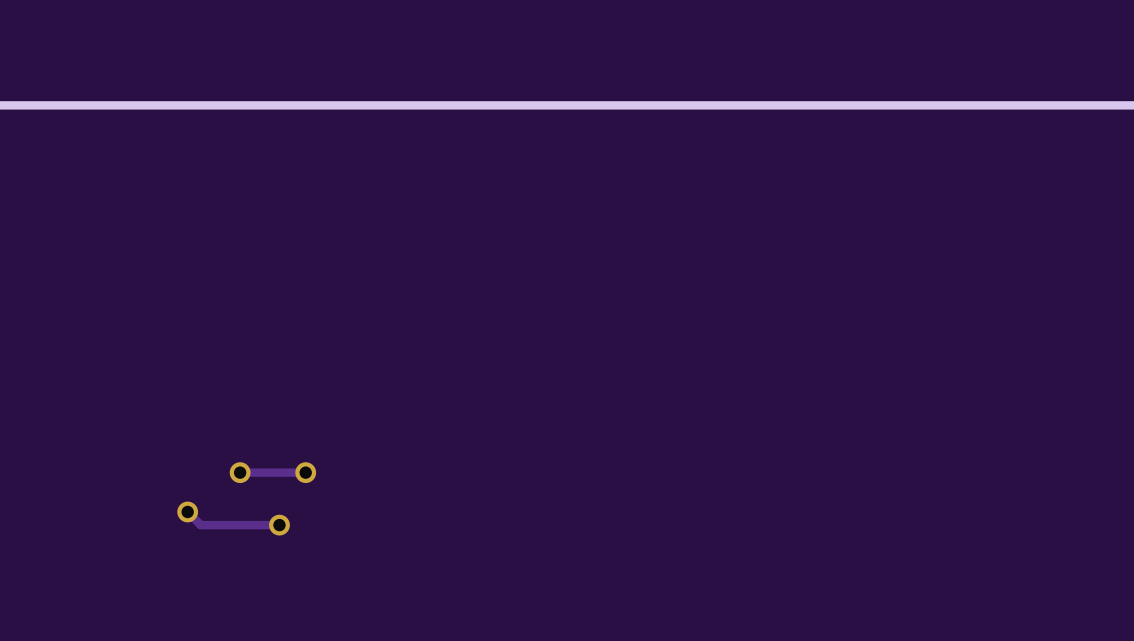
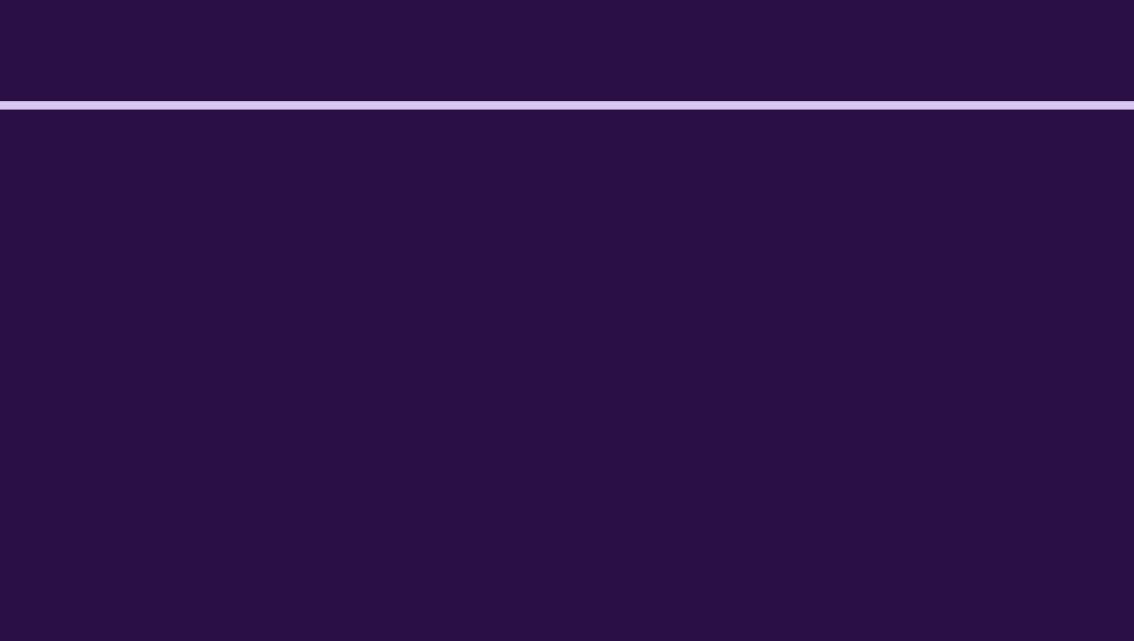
via: (240, 472) -> none
track: (305, 472) (240, 472) -> none
via: (305, 472) -> none
track: (187, 511) (200, 525) (279, 525) -> none
via: (187, 511) -> none
via: (279, 525) -> none

